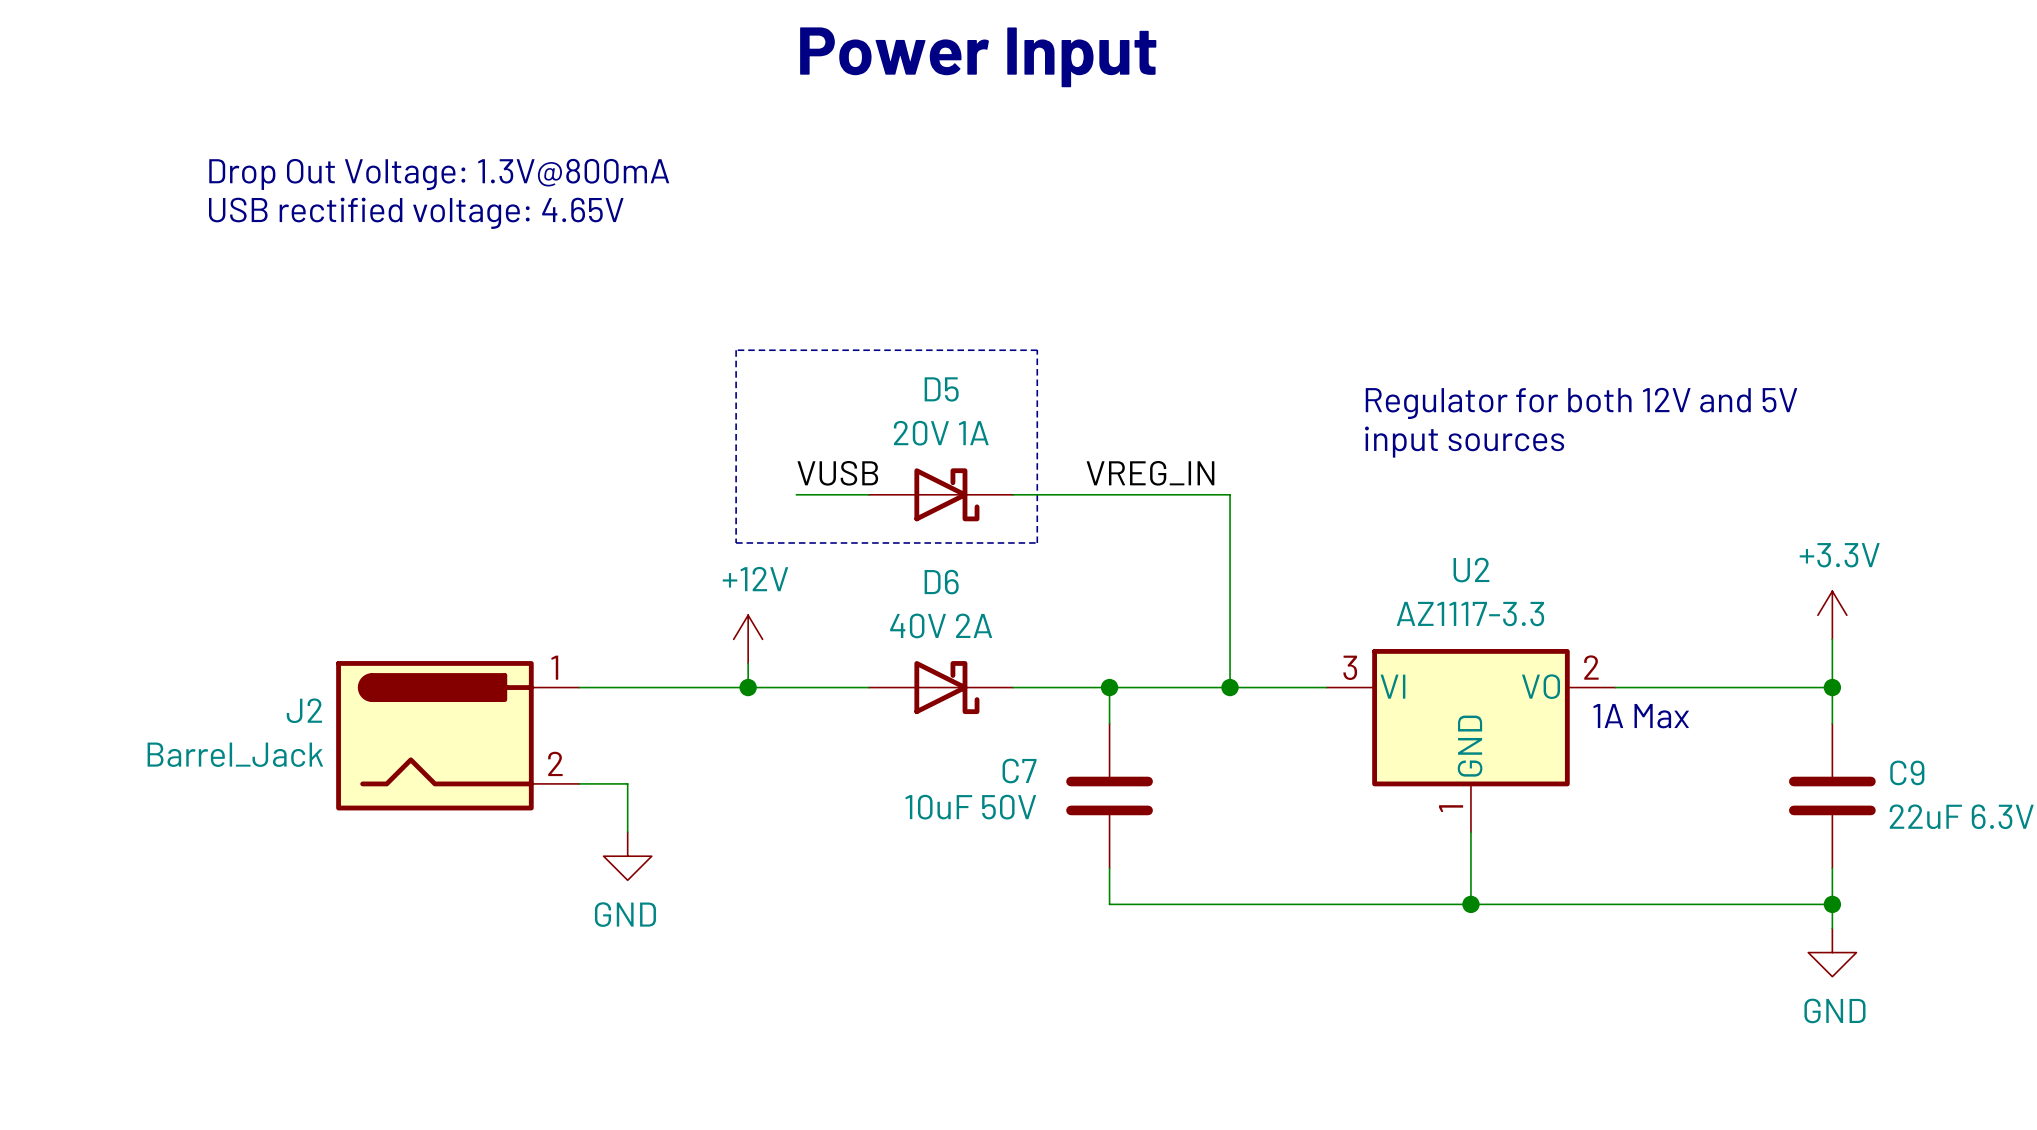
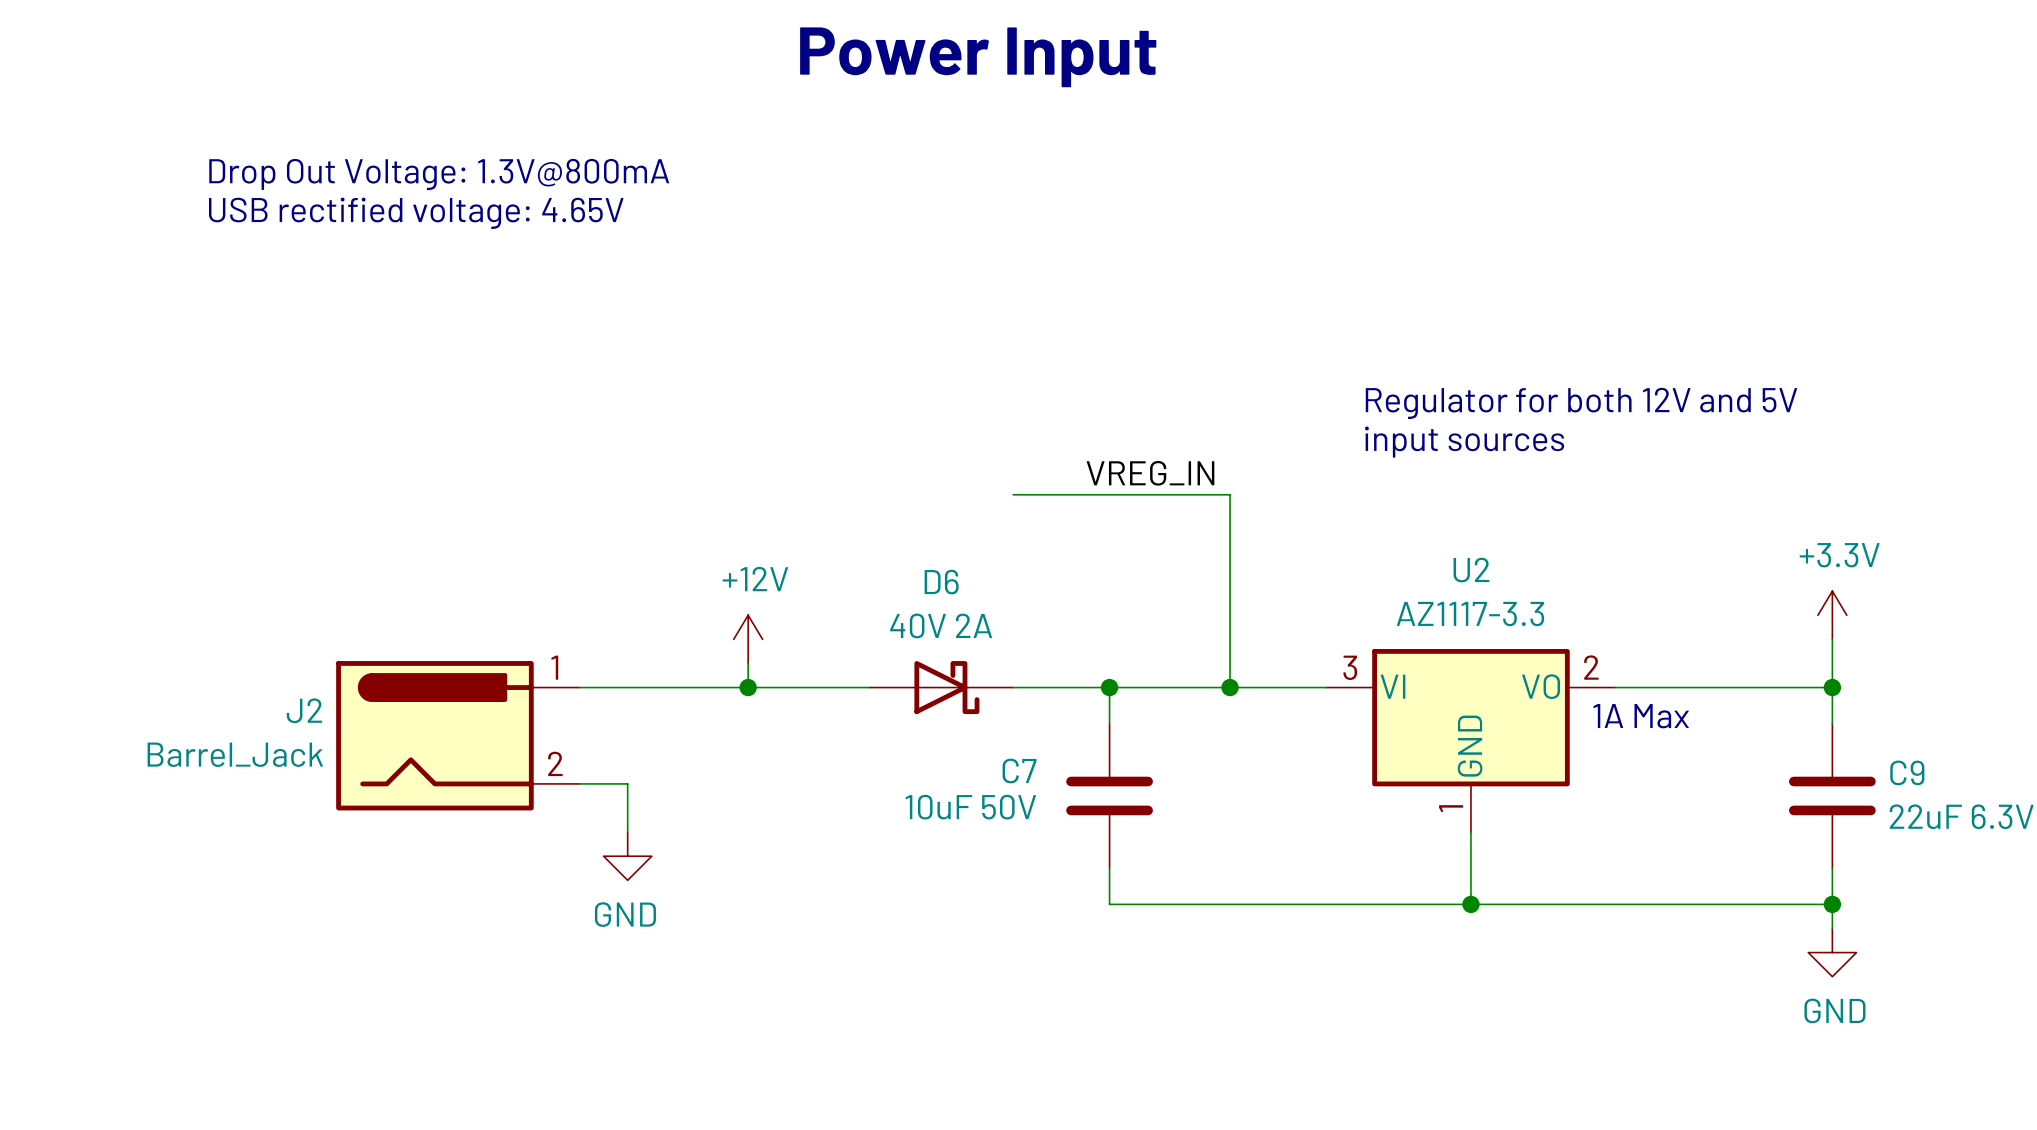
line: (736, 350) (1037, 350) (1037, 542) (736, 542) (736, 350) -> none
label: VUSB (837, 473) -> none
wire: (796, 494) (868, 494) -> none
D5: 20V 1A (940, 494) -> none

